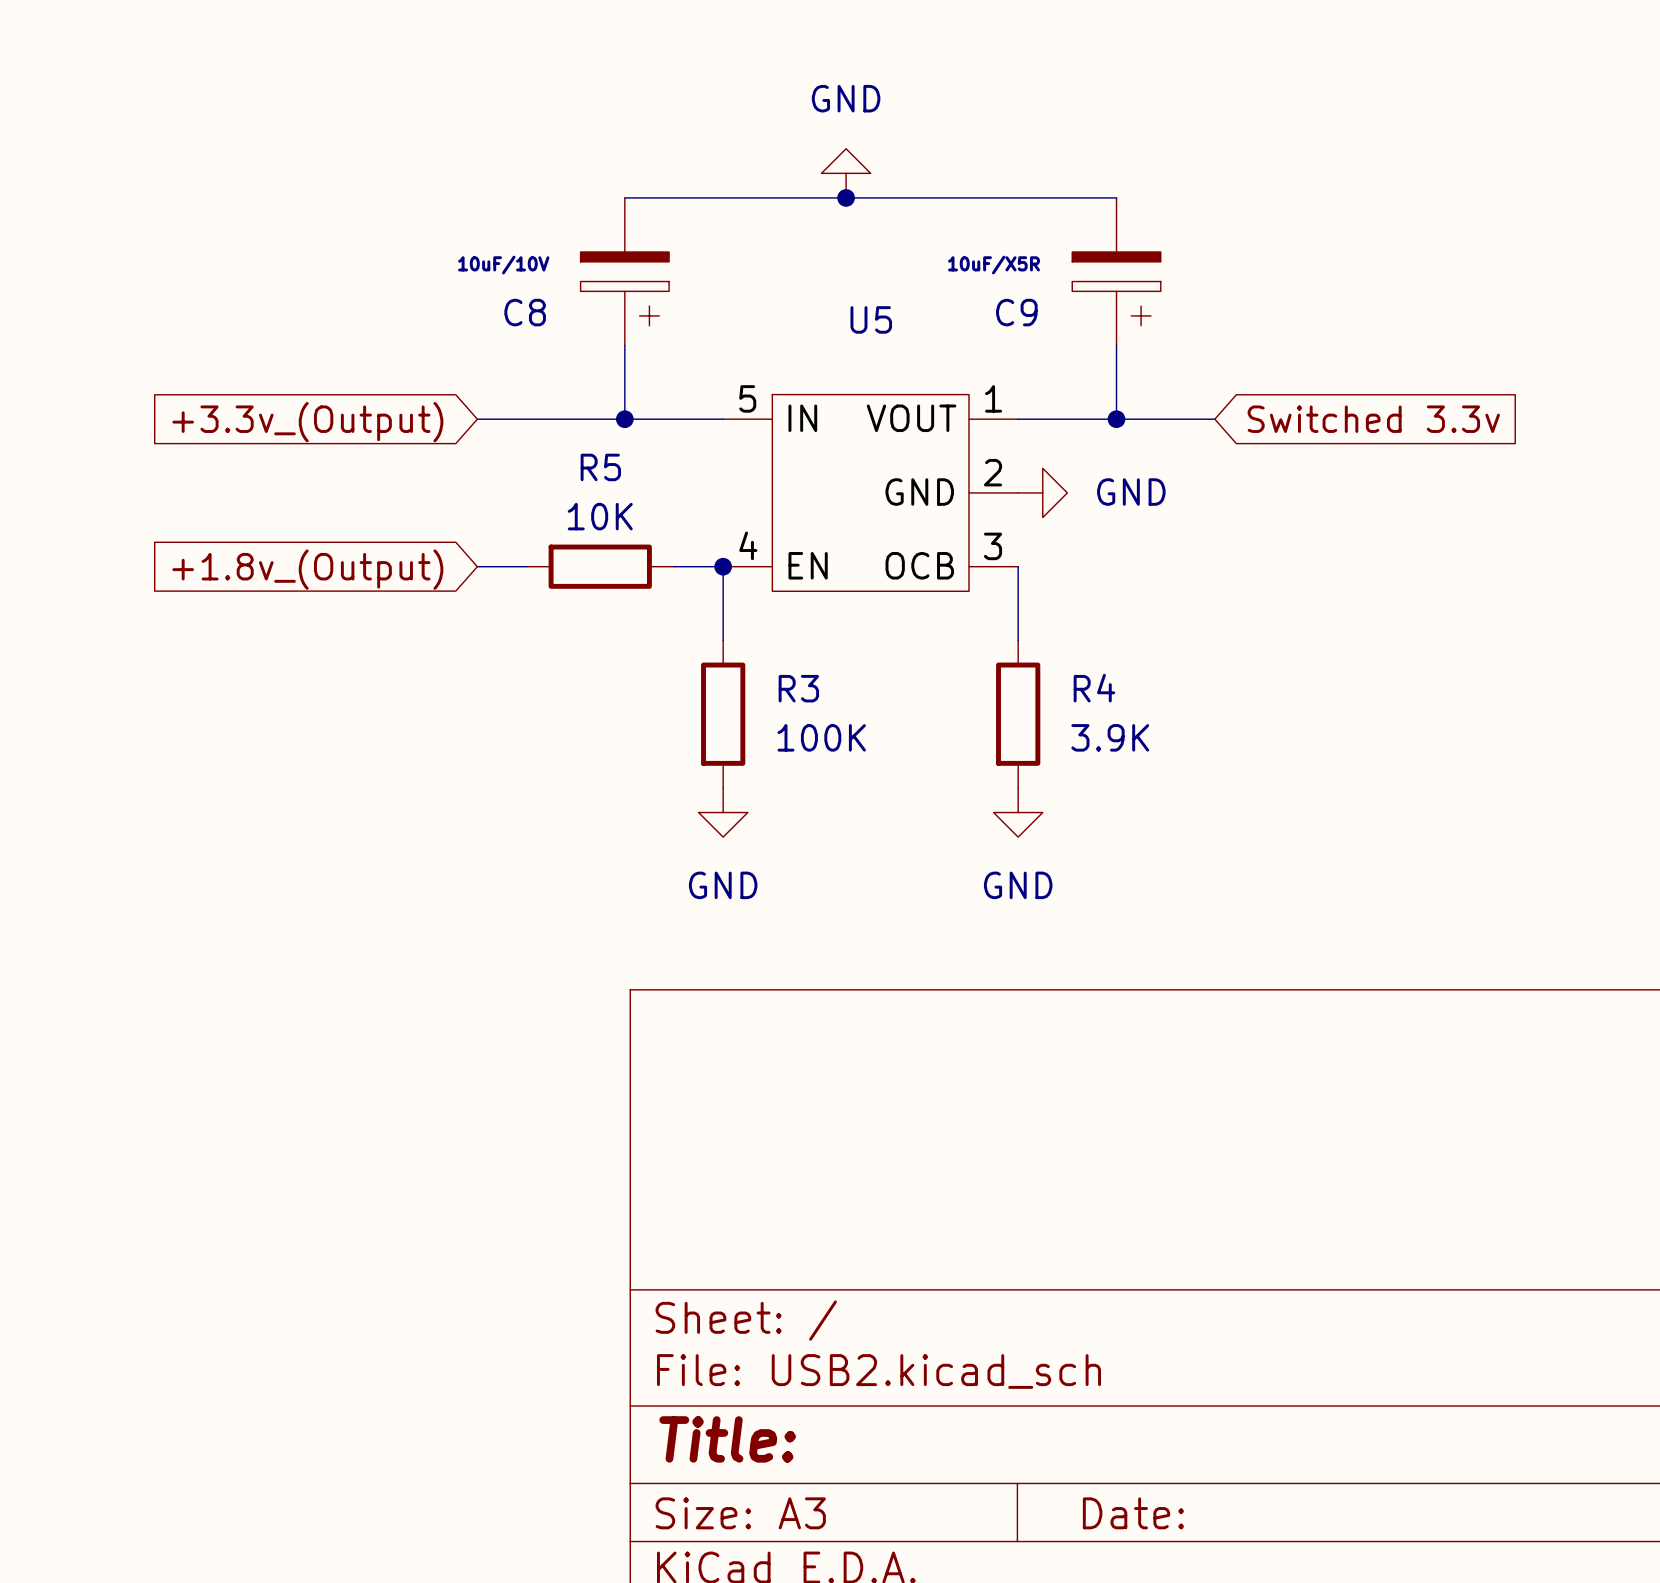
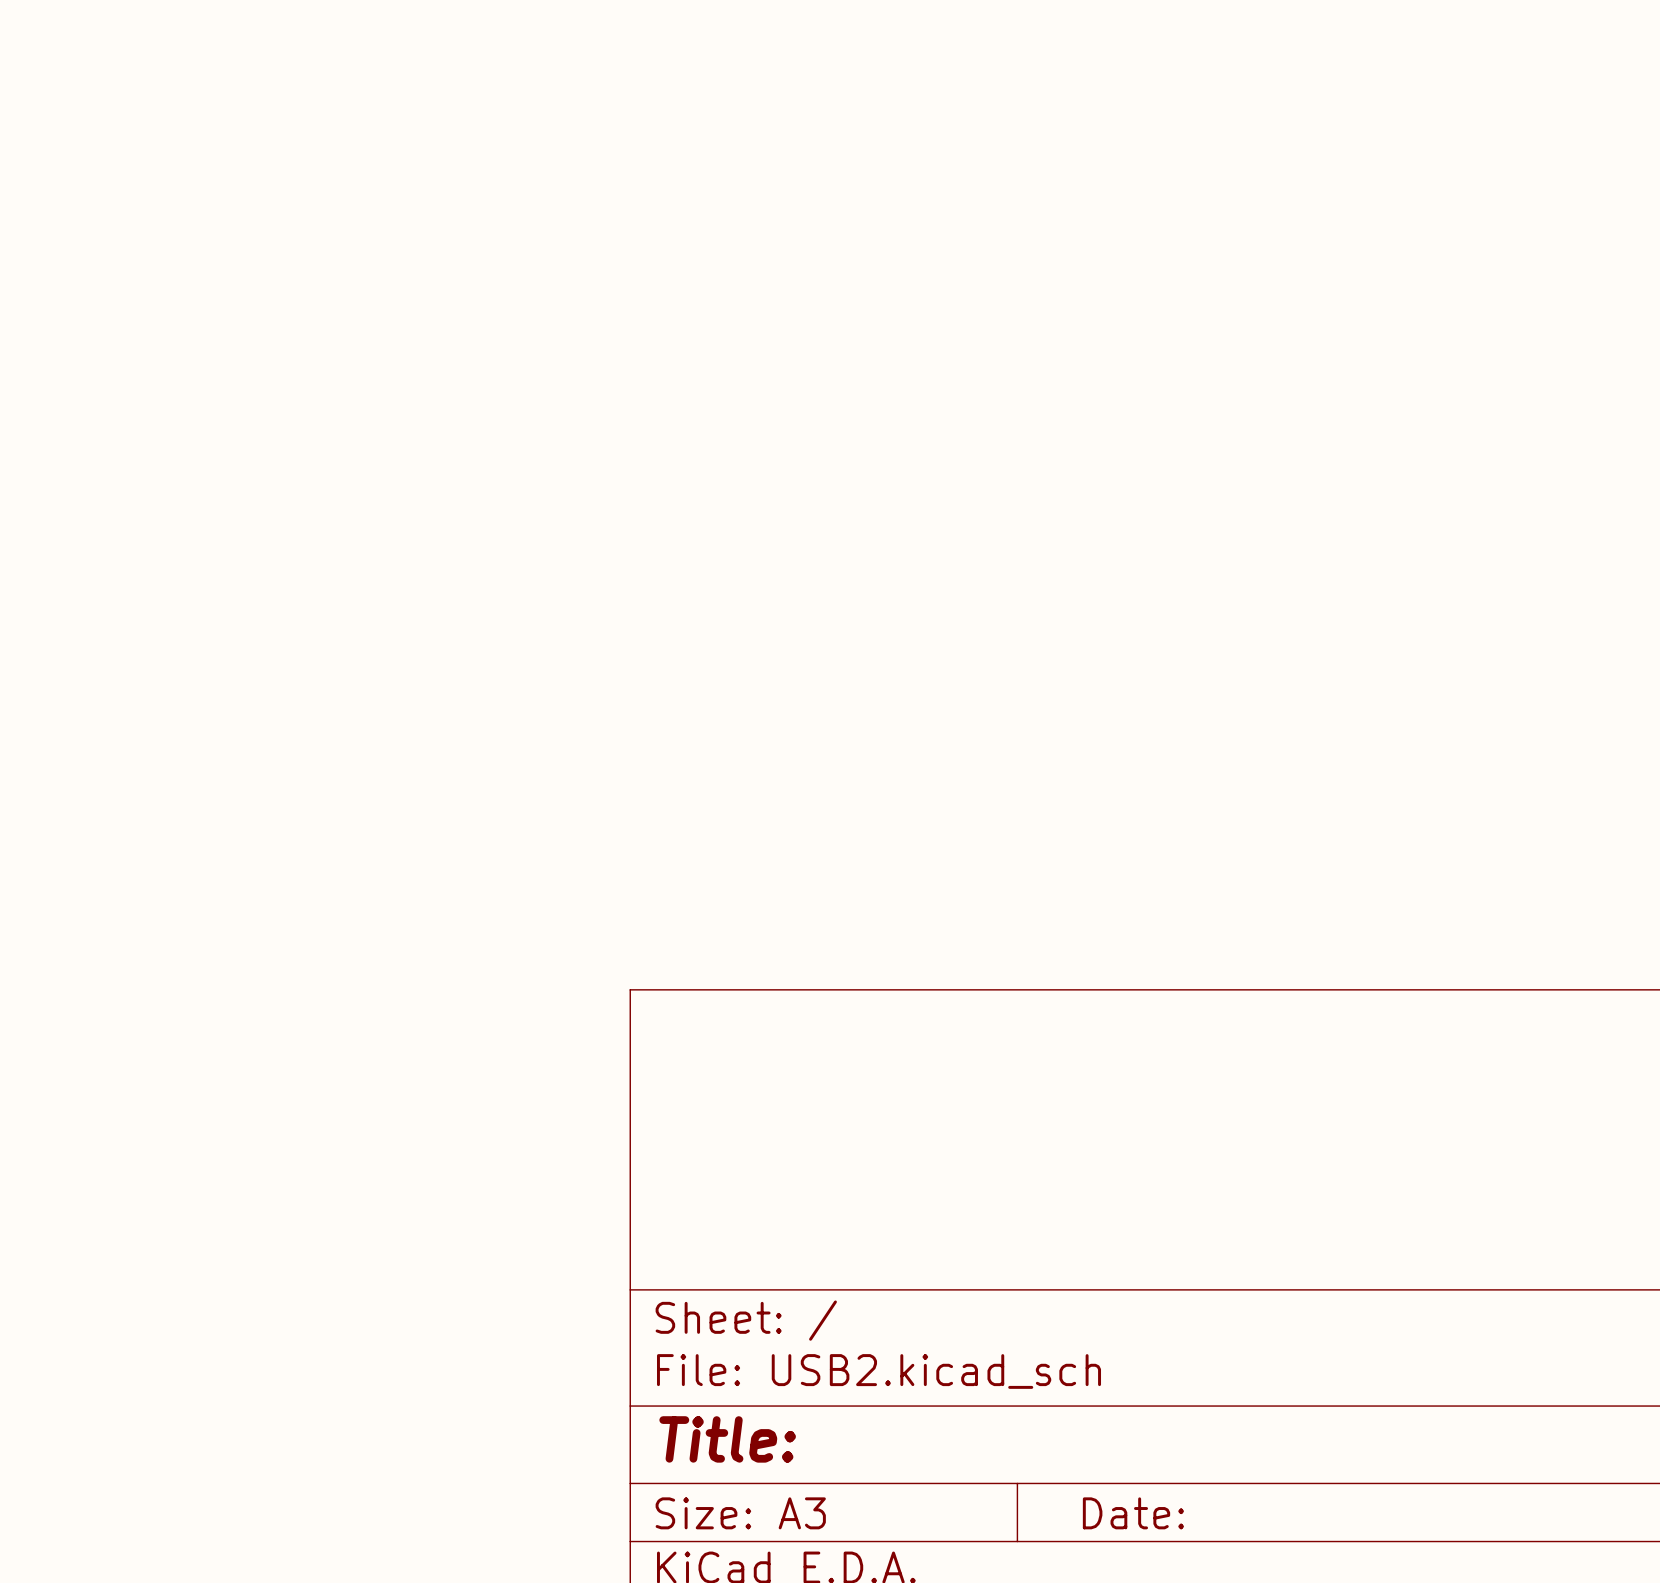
power symbol: GND (846, 173) -> none
wire: (624, 197) (1116, 197) -> none
junction: (846, 197) -> none
C8: 10uF/10V (624, 271) -> none
C9: 10uF/X5R (1116, 271) -> none
wire: (624, 345) (624, 419) -> none
wire: (1116, 345) (1116, 419) -> none
wire: (477, 419) (723, 419) -> none
junction: (624, 419) -> none
wire: (1018, 419) (1214, 419) -> none
junction: (1116, 419) -> none
global label: Switched 3.3v (1373, 419) -> none
global label: +3.3v_(Output) (307, 422) -> none
U5: (870, 492) -> none
power symbol: GND (1042, 492) -> none
wire: (477, 566) (526, 566) -> none
R5: 10K (600, 566) -> none
wire: (674, 566) (723, 566) (723, 640) -> none
junction: (723, 566) -> none
wire: (1018, 566) (1018, 640) -> none
global label: +1.8v_(Output) (307, 569) -> none
R3: 100K (723, 714) -> none
R4: 3.9K (1018, 714) -> none
power symbol: GND (723, 812) -> none
power symbol: GND (1018, 812) -> none

